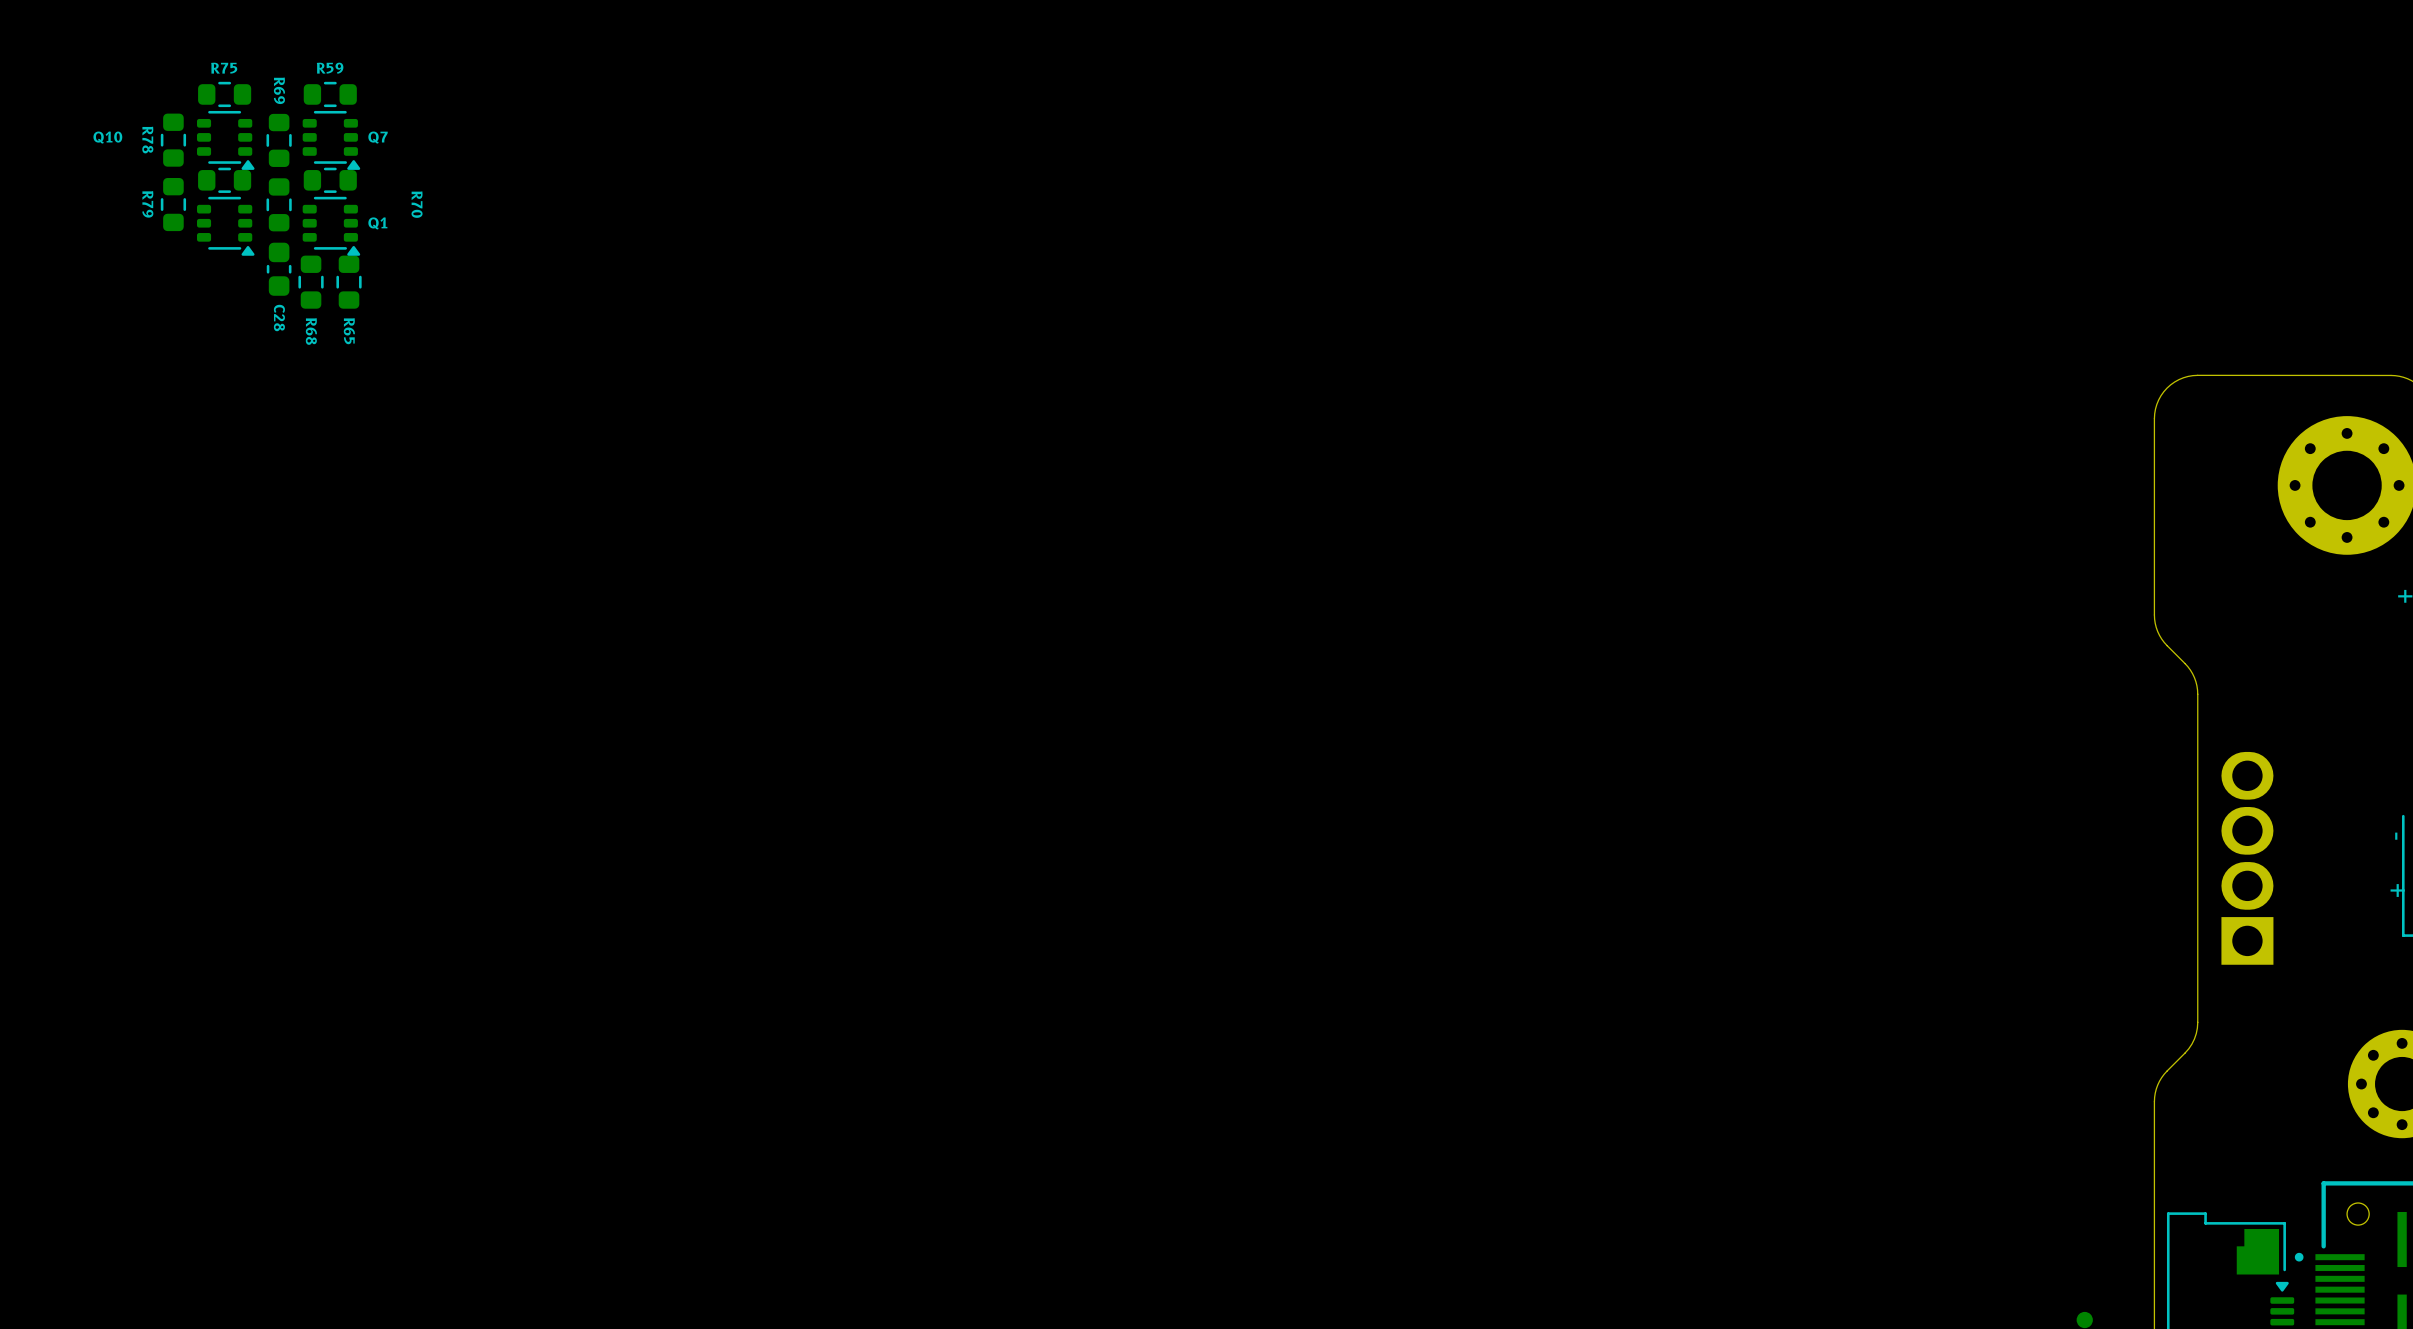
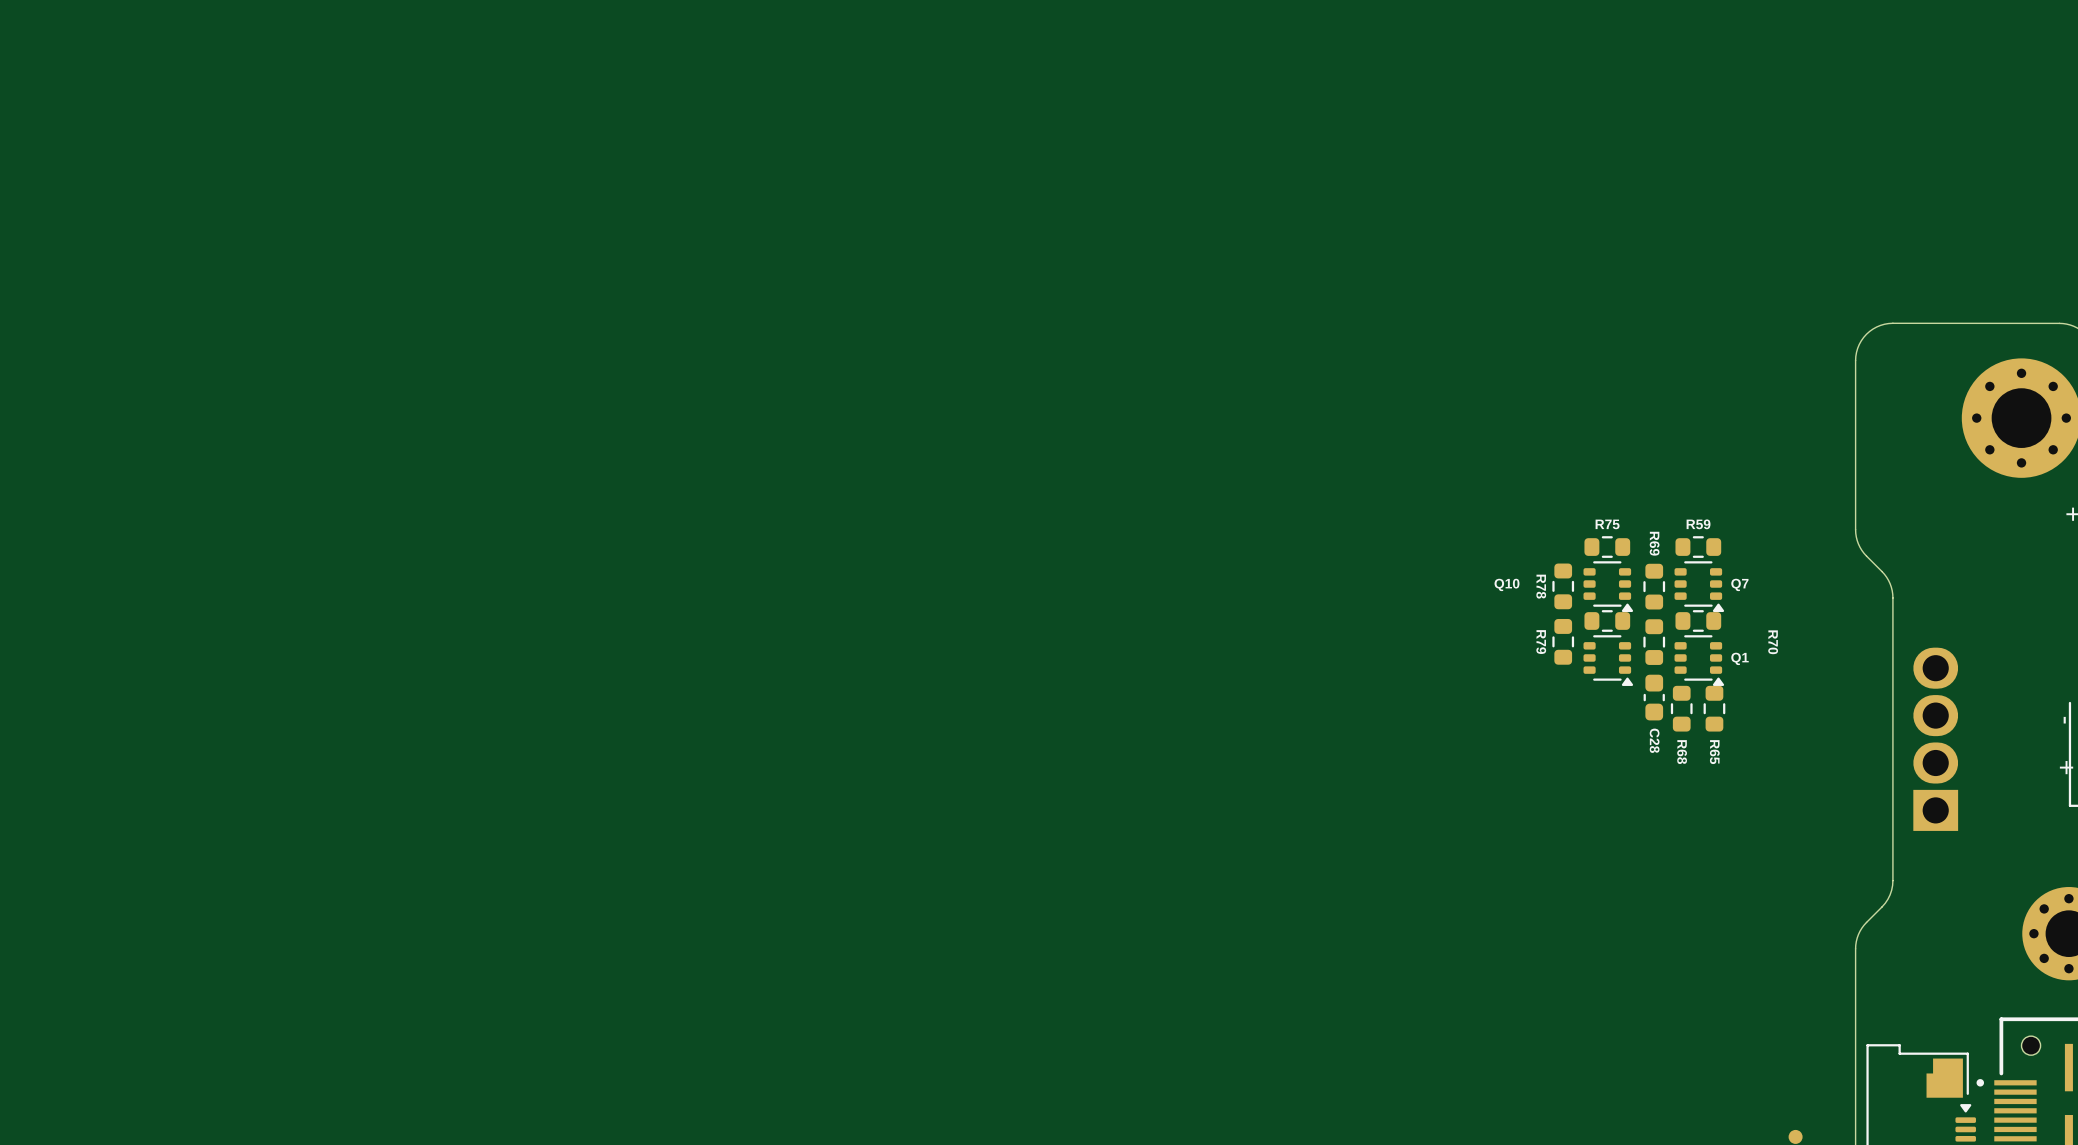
R75 position: (224, 94) -> (1607, 547)
R59 position: (330, 94) -> (1698, 547)
R78 position: (173, 140) -> (1563, 586)
Q10 position: (225, 140) -> (1608, 586)
R69 position: (279, 140) -> (1654, 586)
Q7 position: (331, 140) -> (1699, 586)
part: (224, 180) -> none
part: (330, 180) -> none
R79 position: (173, 204) -> (1563, 641)
R70 position: (279, 204) -> (1654, 642)
part: (225, 226) -> none
Q1 position: (331, 226) -> (1699, 660)
C28 position: (279, 269) -> (1654, 697)
R68 position: (311, 282) -> (1681, 708)
R65 position: (349, 282) -> (1714, 708)
part: none -> (1607, 620)
part: none -> (1698, 620)
part: none -> (1608, 660)

